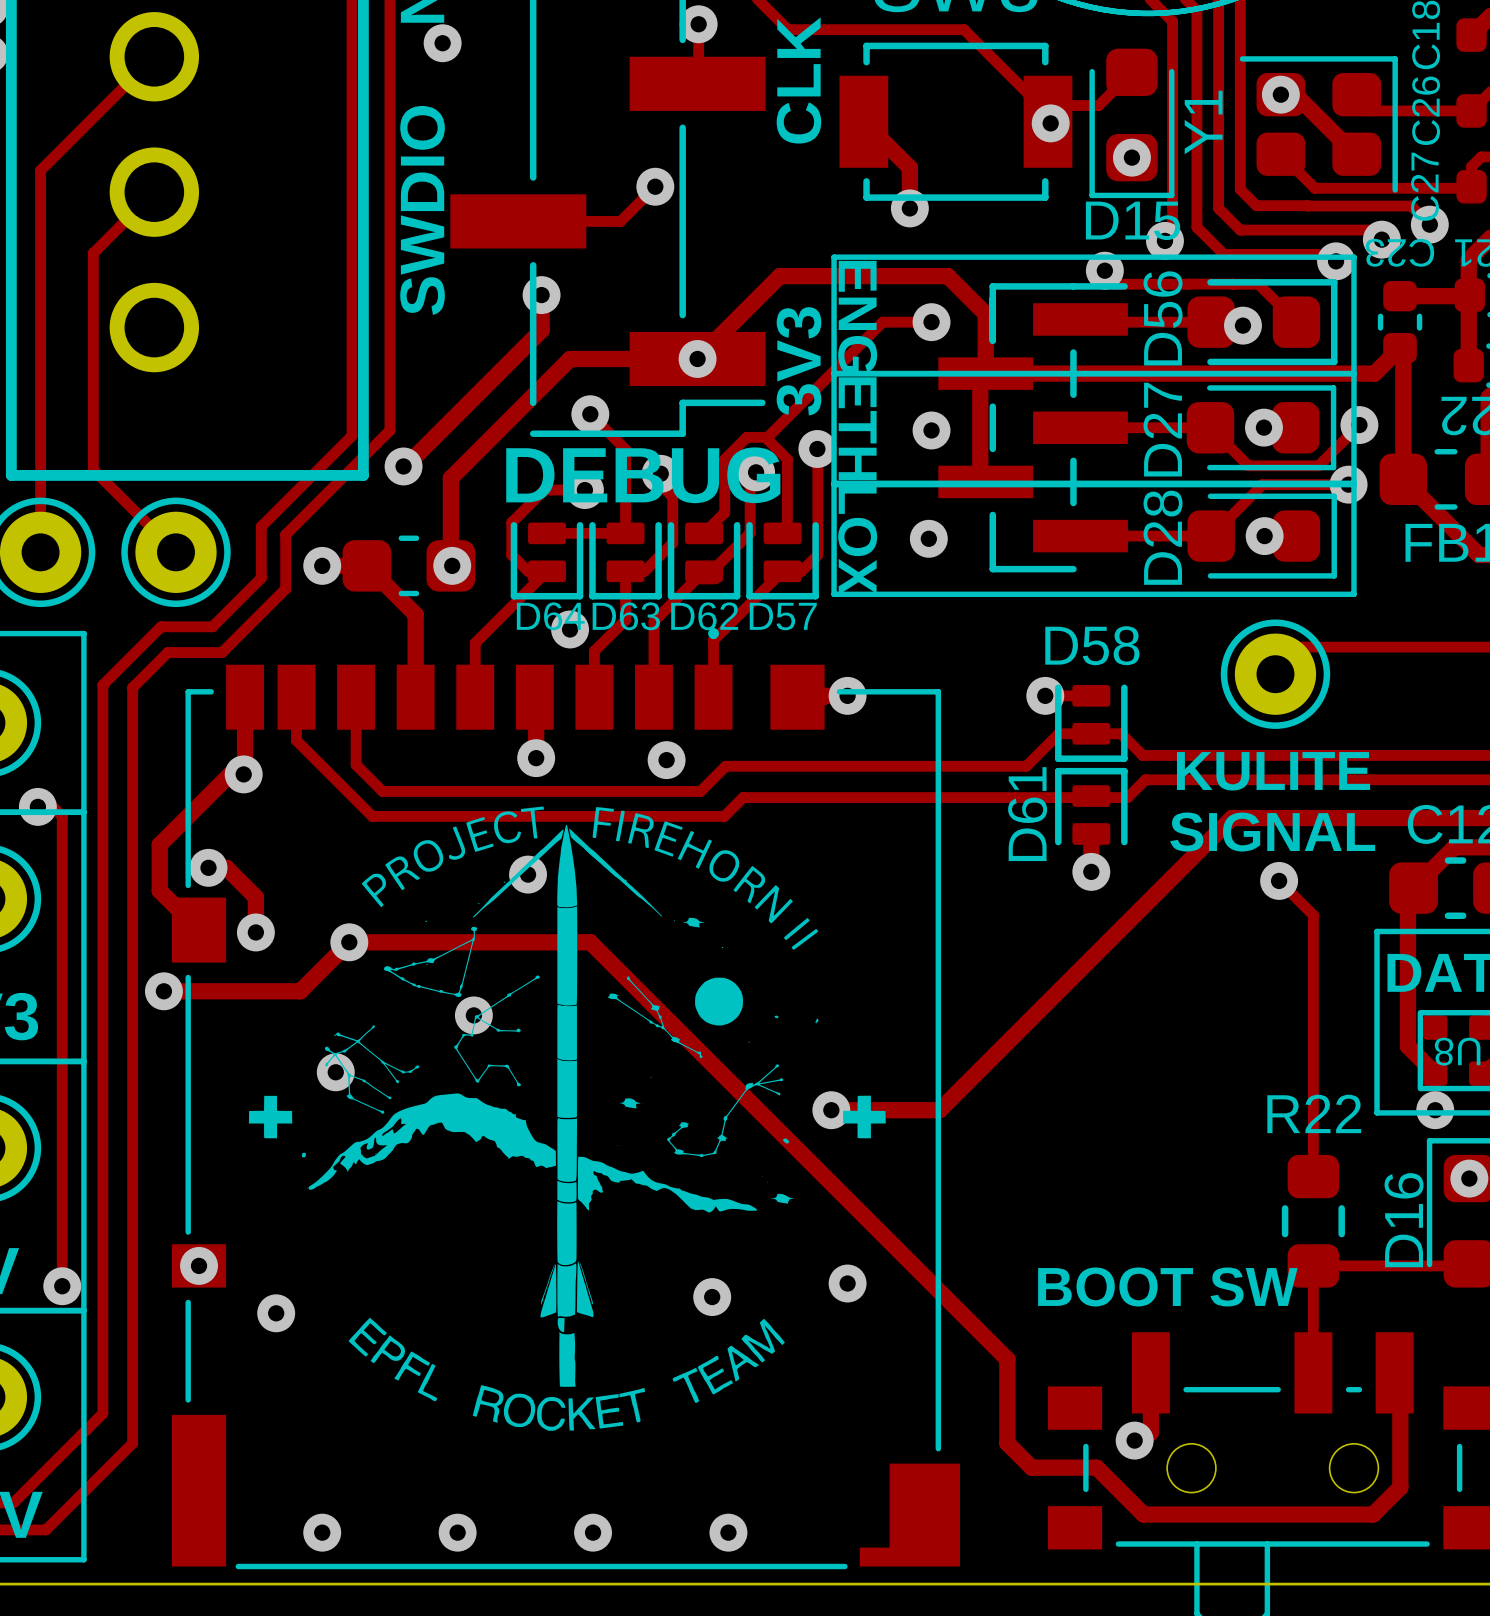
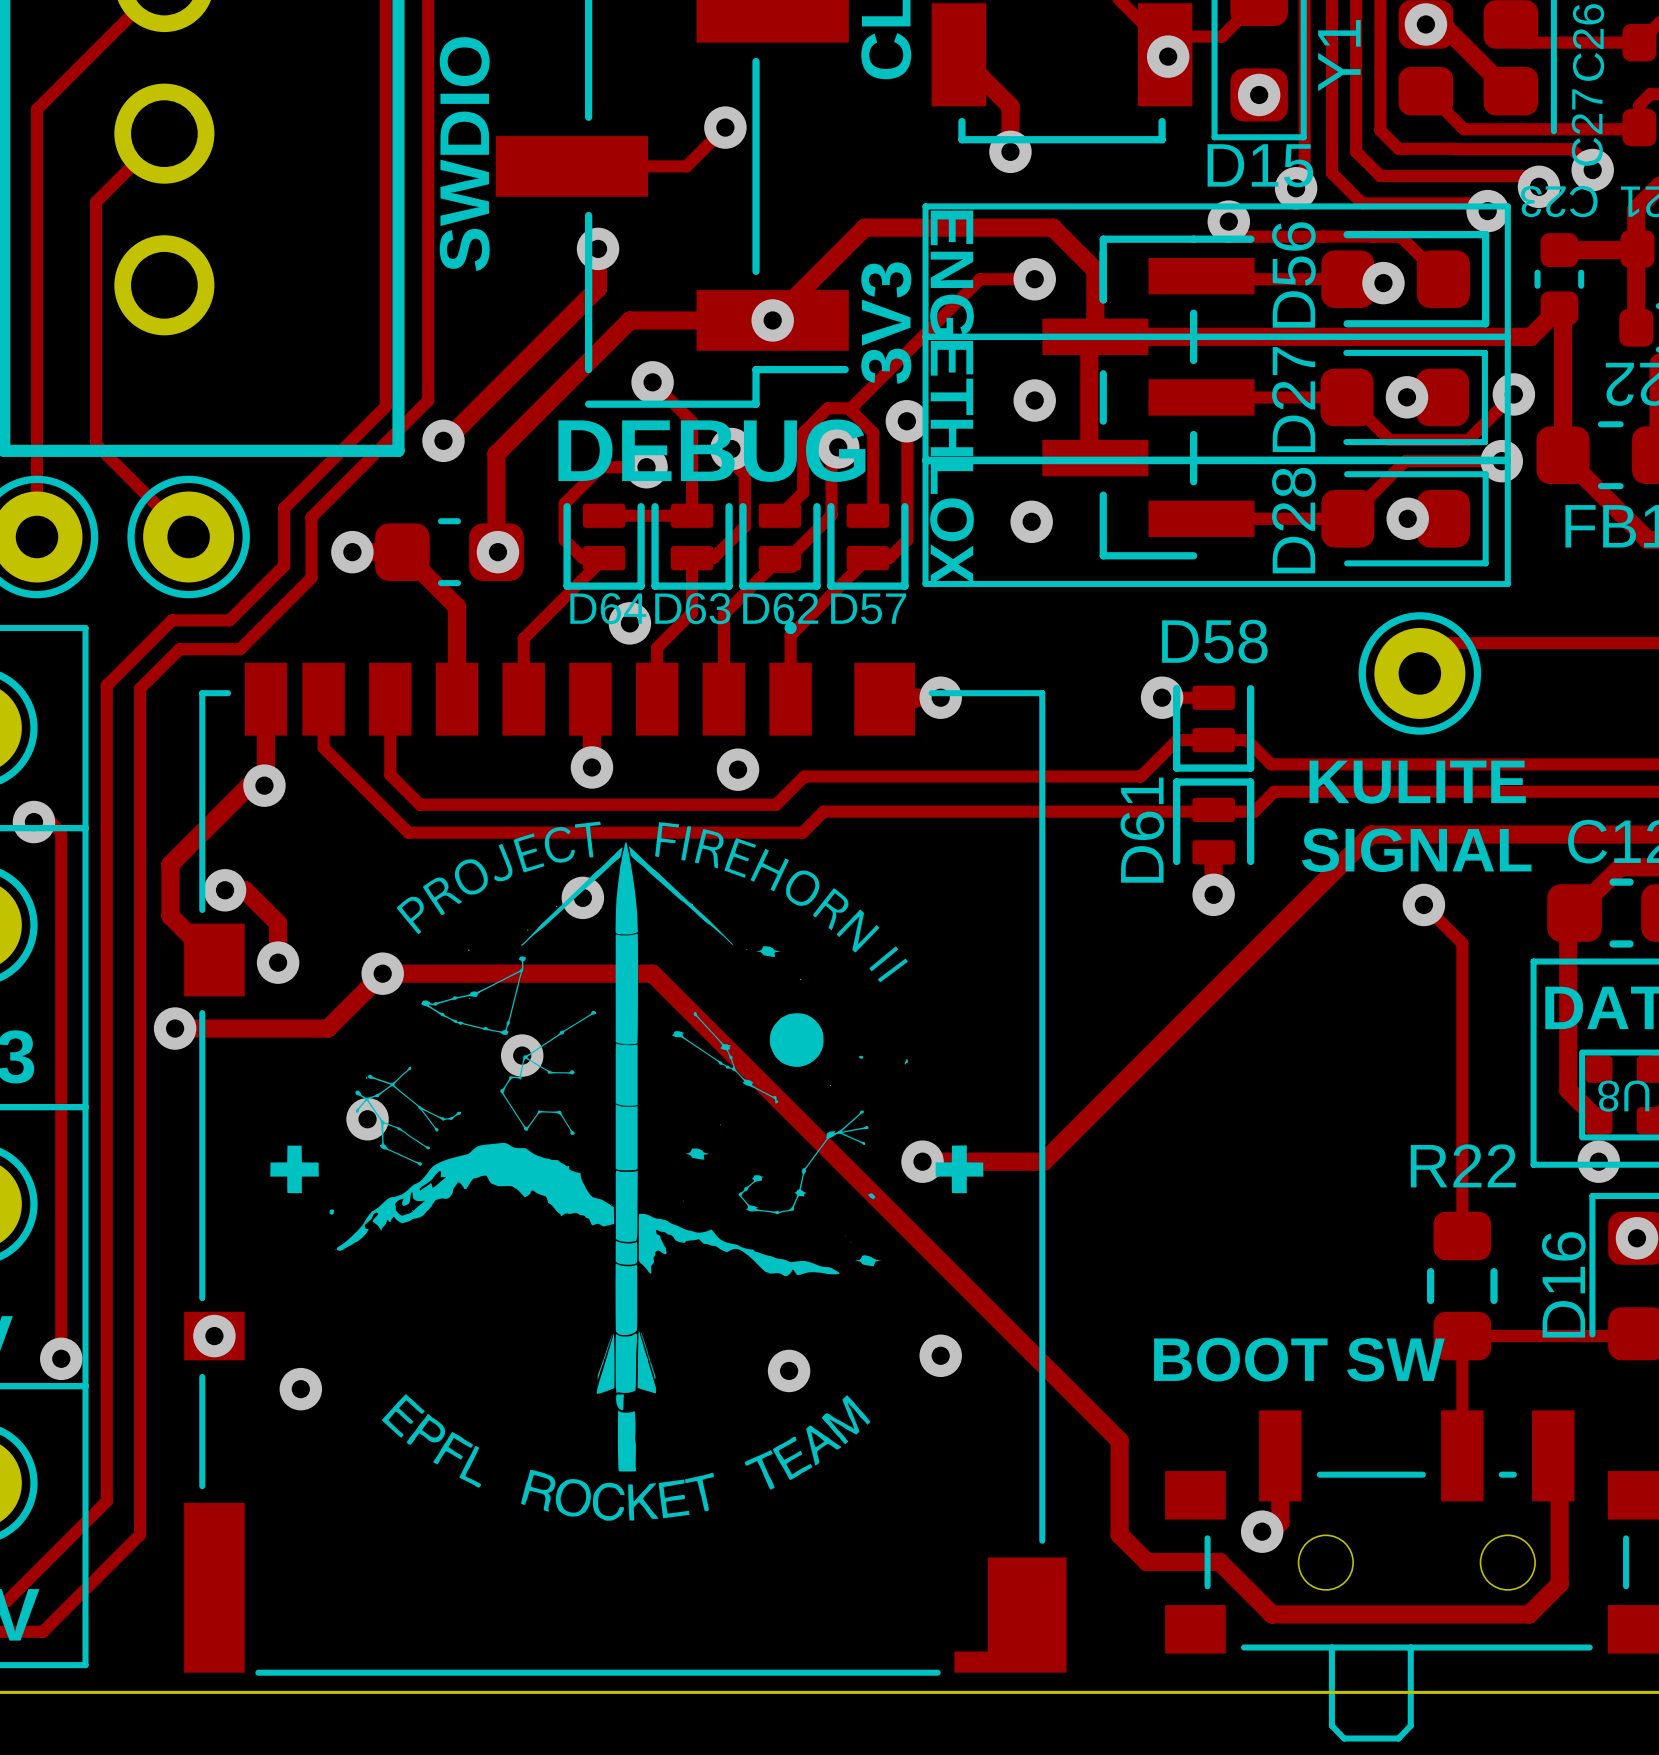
via: (322, 1532) -> none
via: (457, 1532) -> none
via: (593, 1532) -> none
via: (728, 1532) -> none

